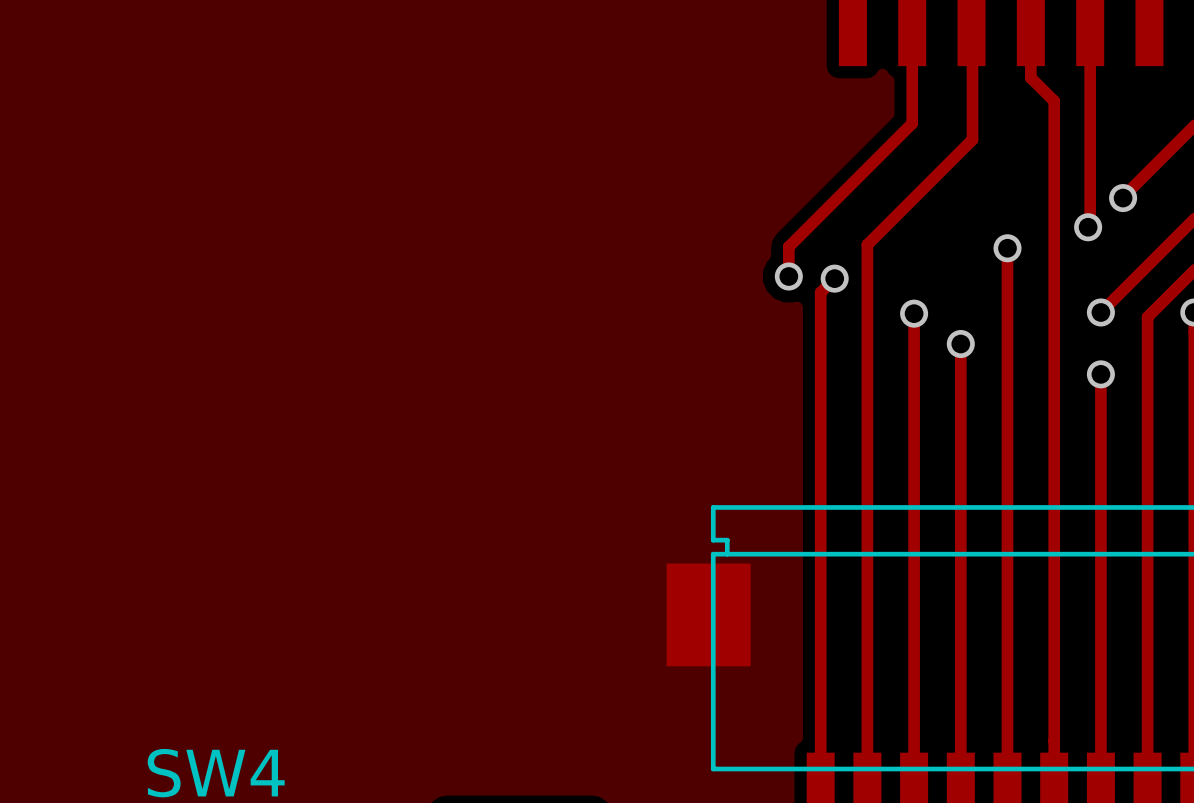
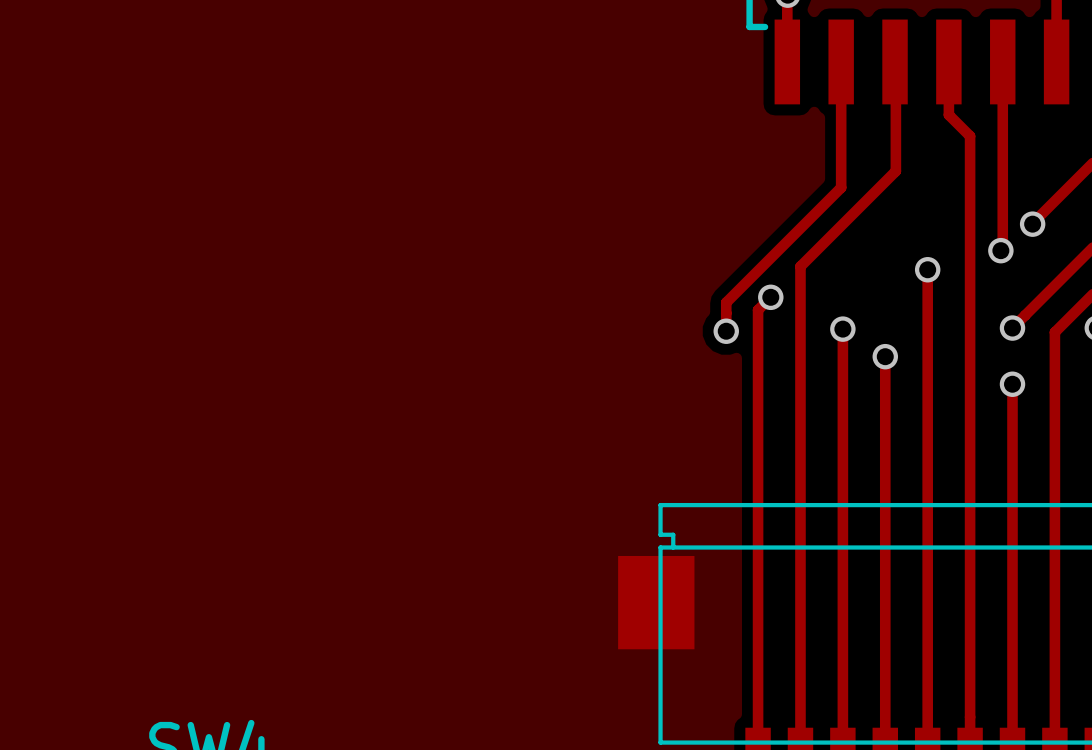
track: (912, 123) (788, 246) (788, 276) -> (841, 156) (841, 187) (726, 302) (726, 331)
via position: (788, 276) -> (726, 331)

